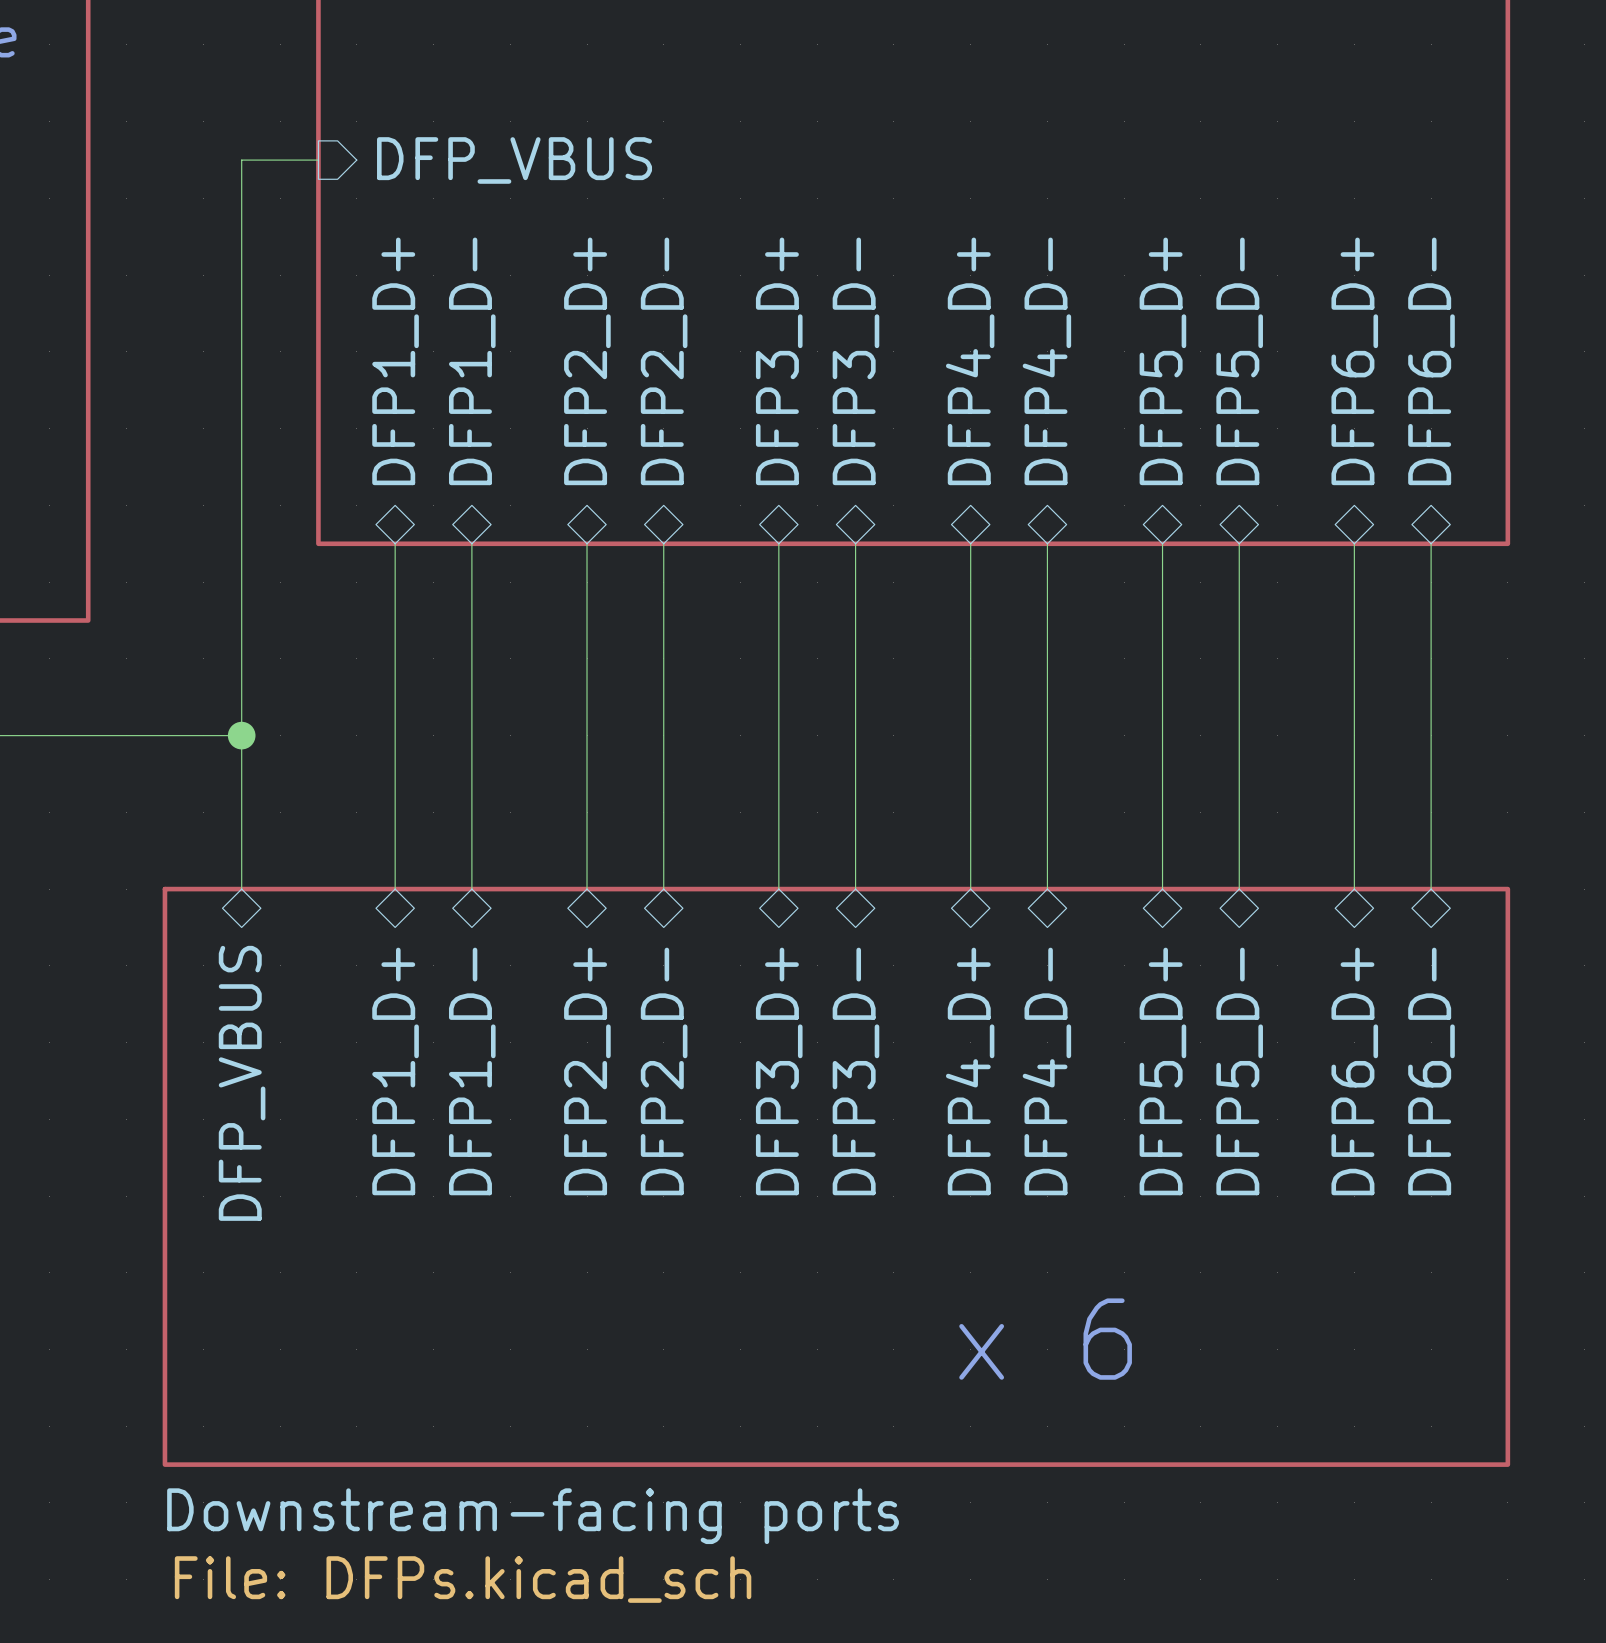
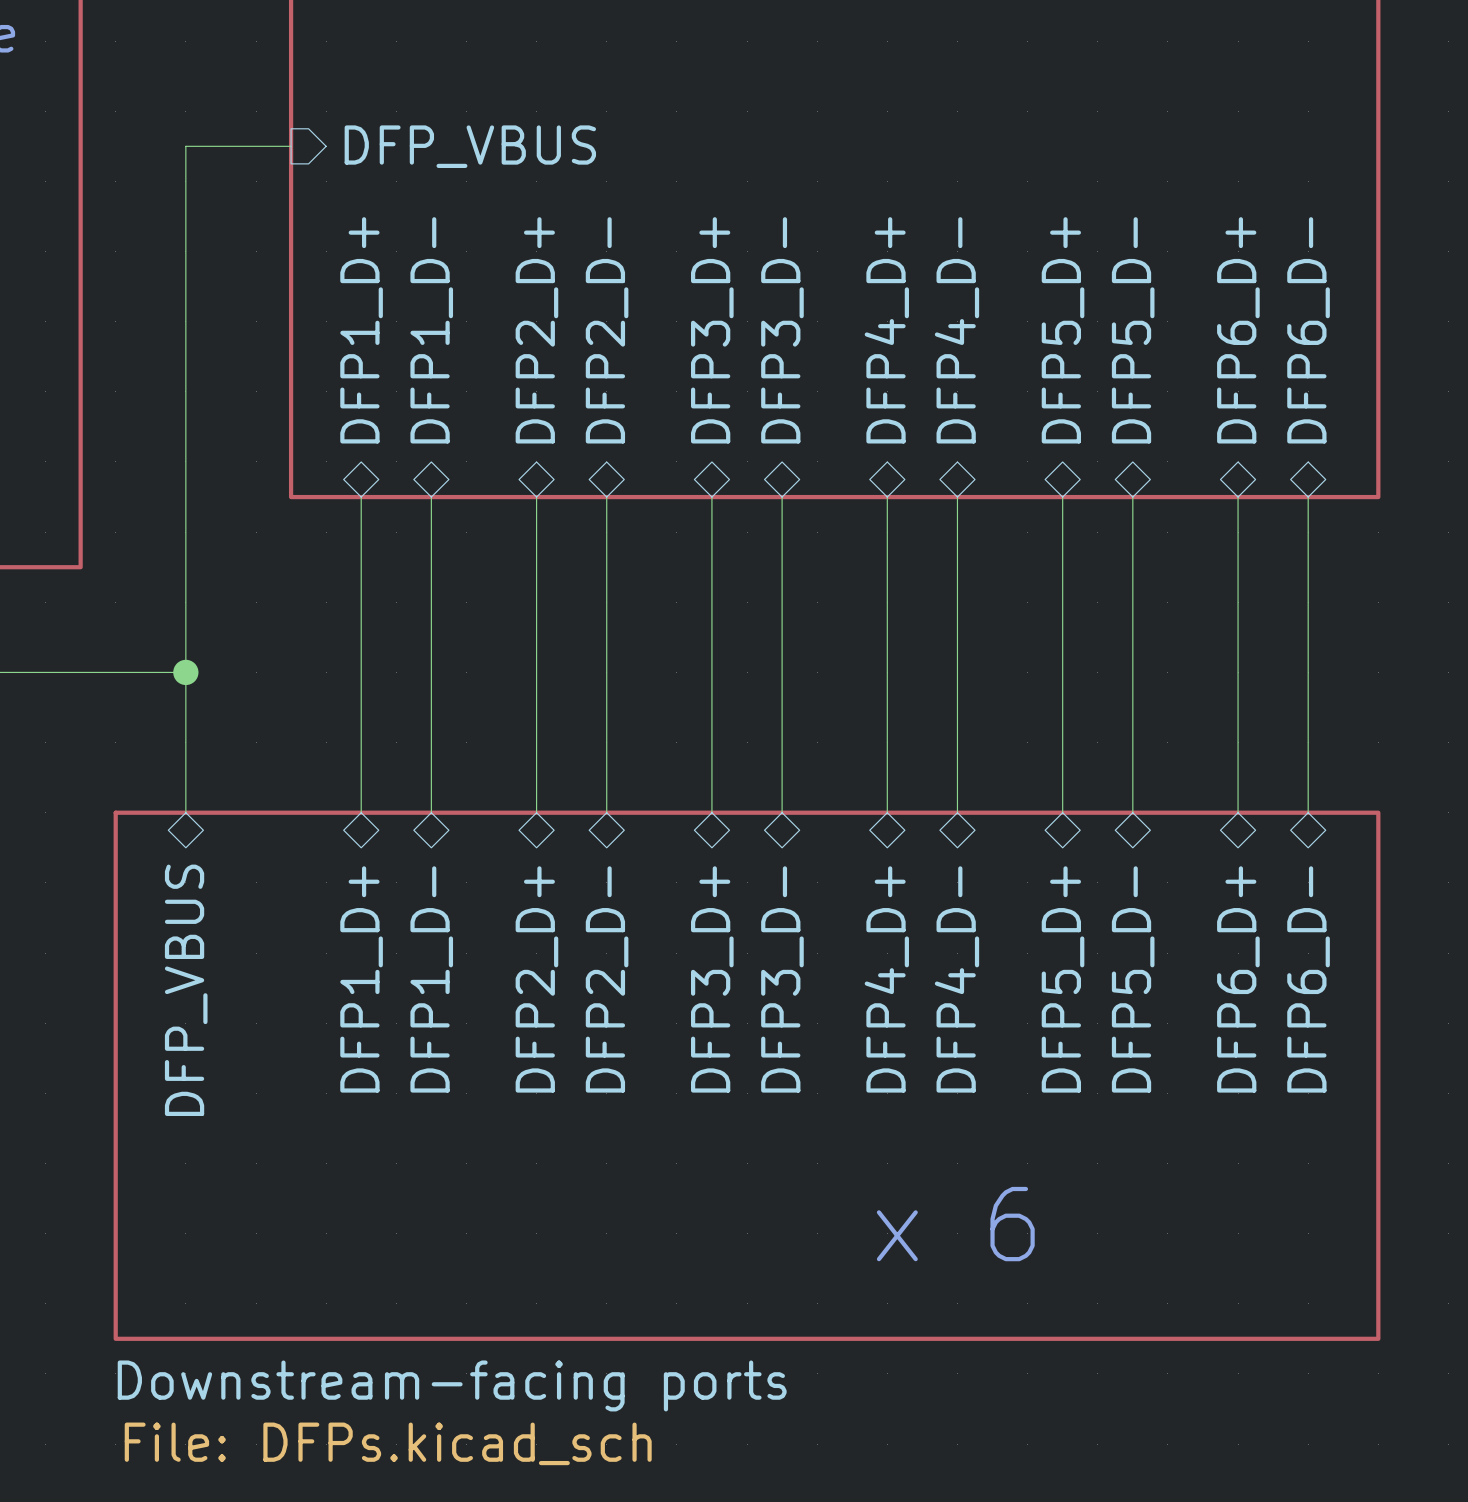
wire: (241, 160) (241, 889) -> (220, 146) (185, 146) (185, 812)
wire: (203, 735) (241, 735) -> none
junction position: (241, 735) -> (185, 672)
sheet Downstream-facing ports shape: [162, 886, 1511, 1467] -> [113, 810, 1381, 1341]
sheet pin position: DFP_VBUS (242, 1083) -> DFP_VBUS (186, 990)

